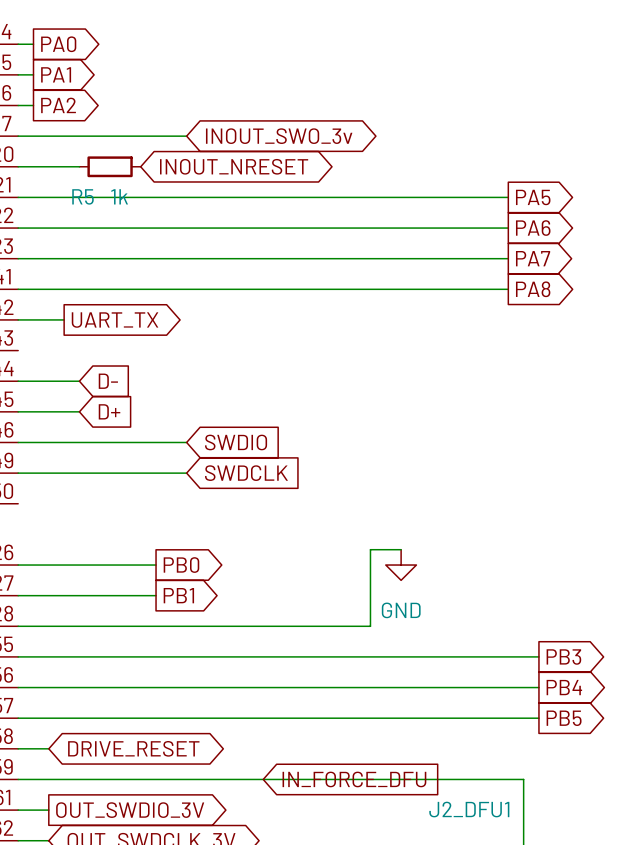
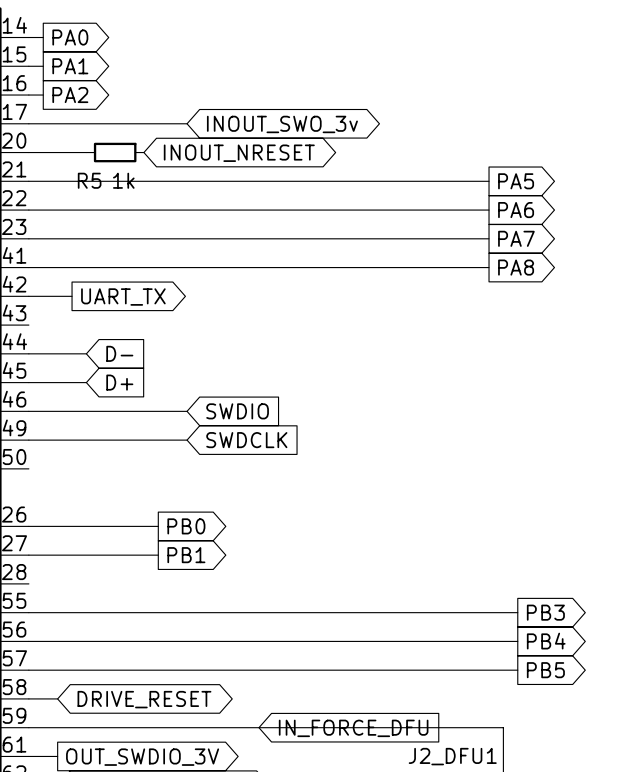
wire: (401, 549) (370, 549) (370, 626) (18, 626) -> none
power symbol: GND (401, 565) -> none

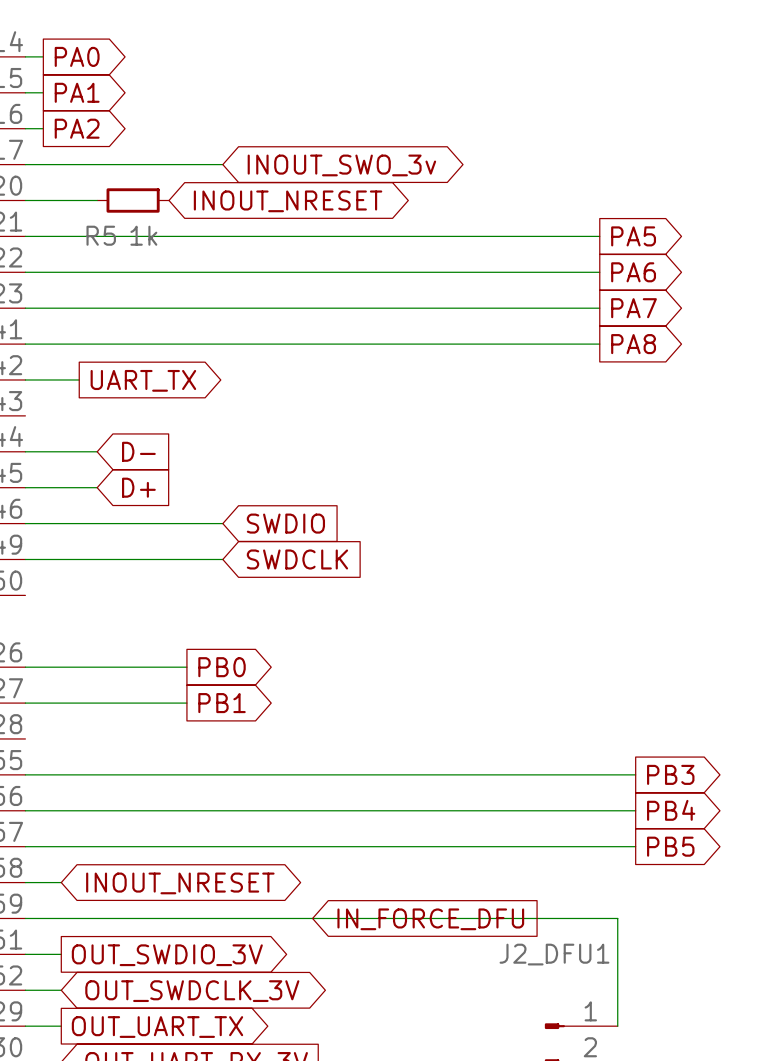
global label: DRIVE_RESET (144, 699) -> INOUT_NRESET (180, 883)

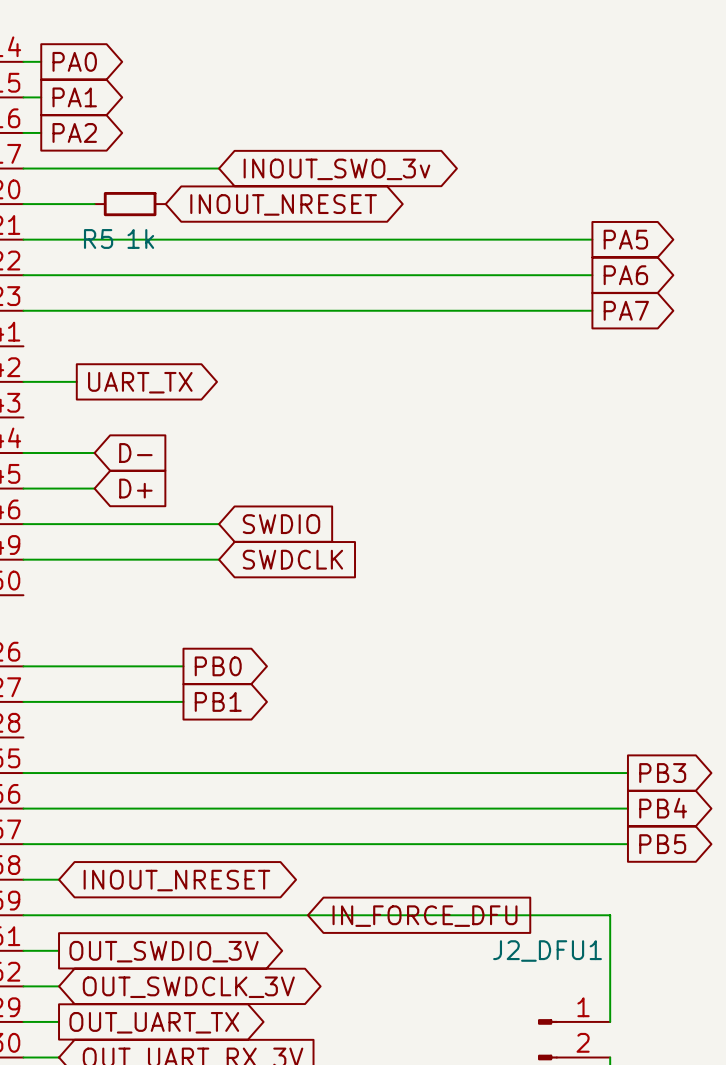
wire: (25, 344) (599, 344) -> none
global label: PA8 (633, 344) -> none

